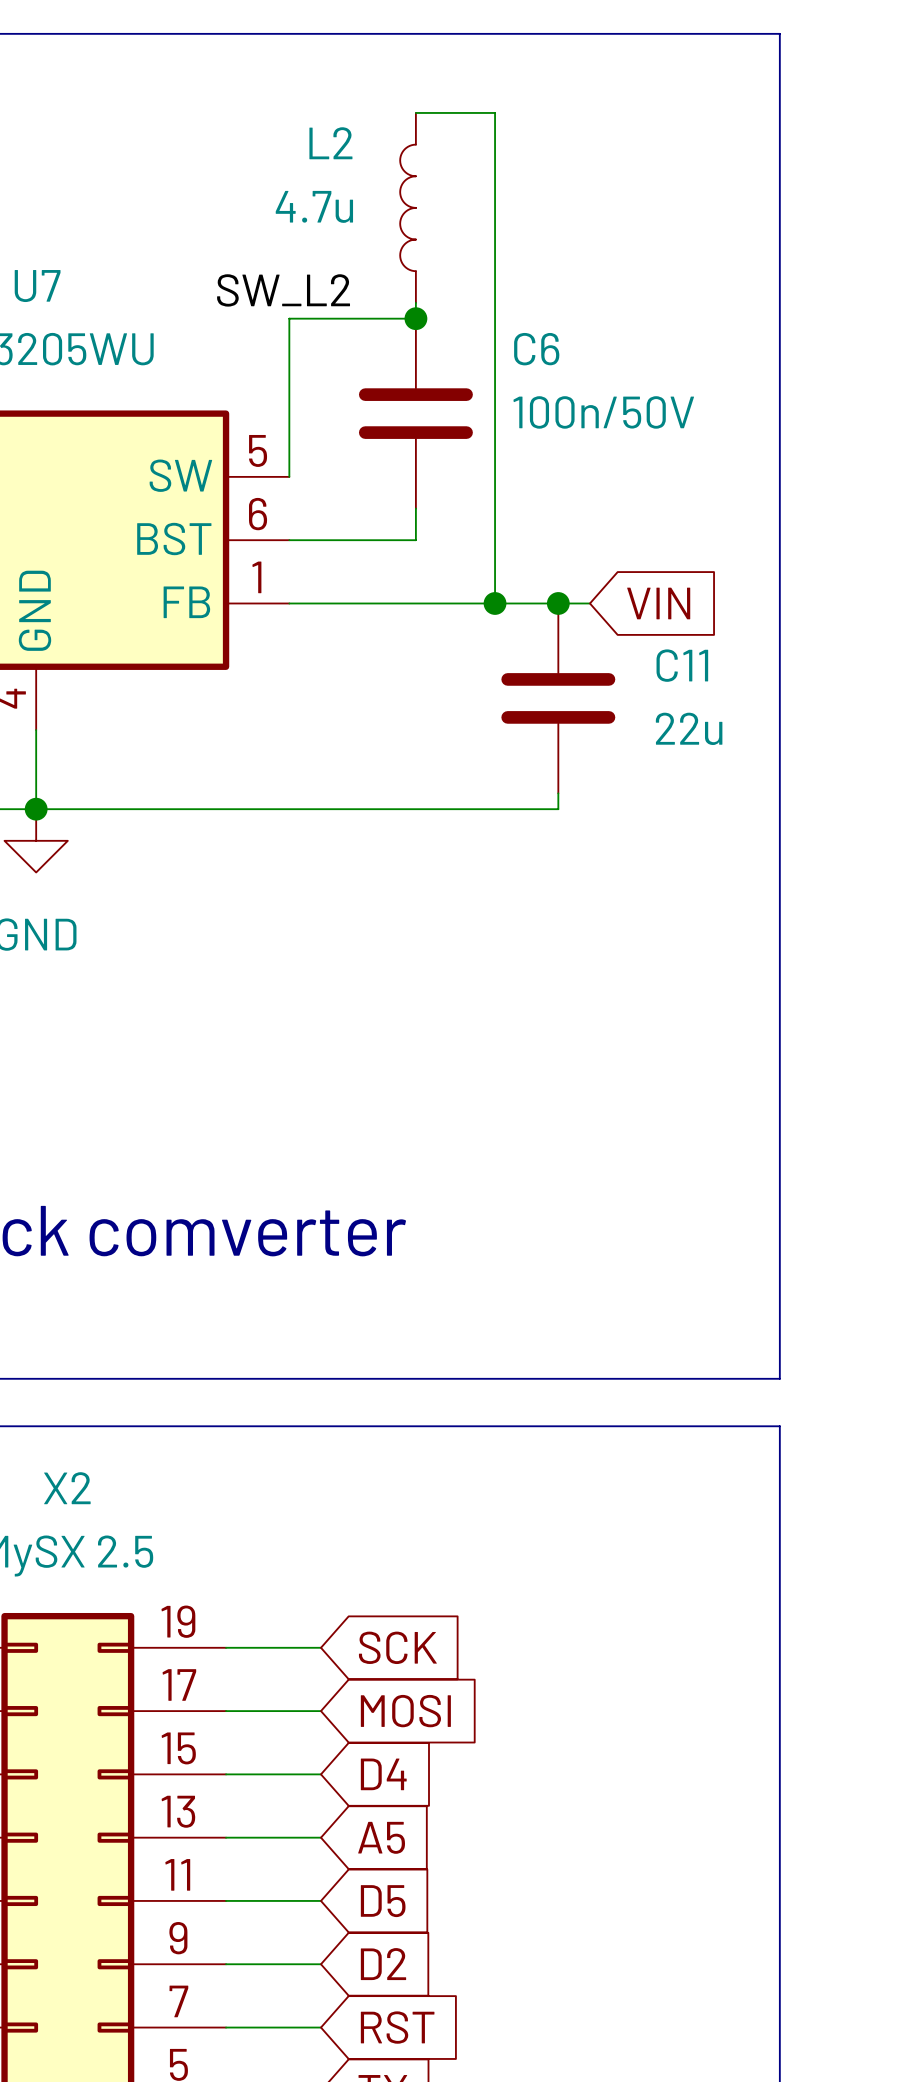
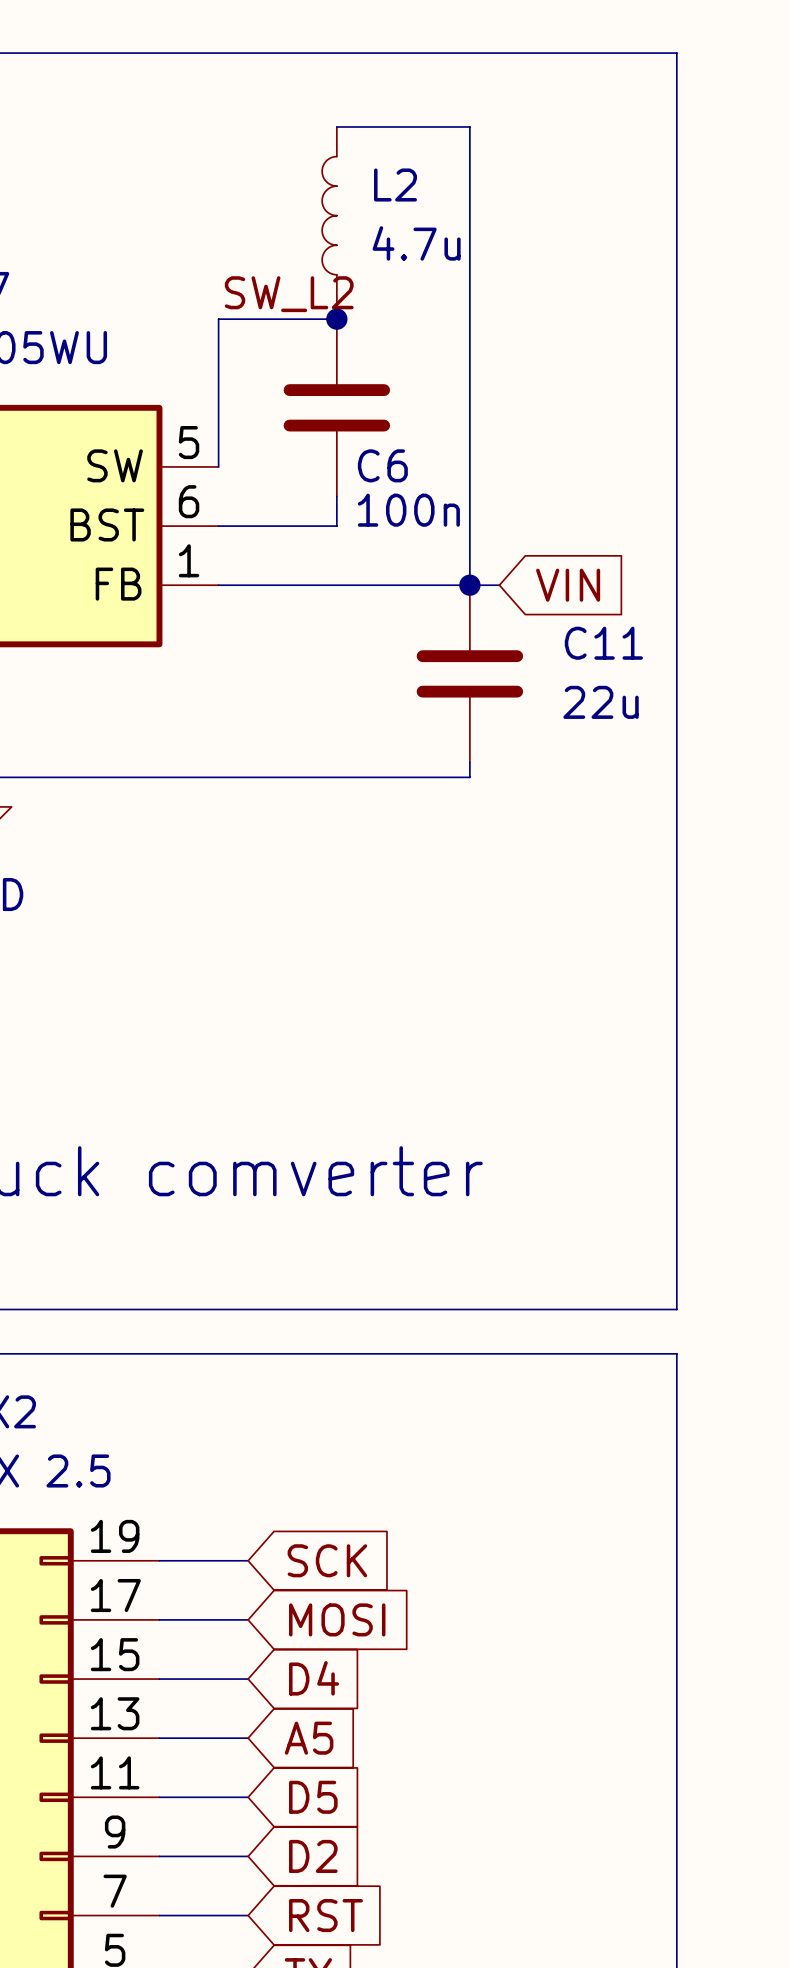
wire: (495, 112) (495, 603) -> (410, 126) (469, 126) (469, 585)
L2 name position: L2 (330, 143) -> L2 (395, 185)
L2 value position: 4.7u (314, 206) -> 4.7u (416, 243)
label position: SW_L2 (283, 290) -> SW_L2 (289, 294)
C6 name position: C6 (536, 349) -> C6 (382, 465)
C6 value: 100n/50V (603, 412) -> 100n (408, 510)
junction: (495, 603) -> none

